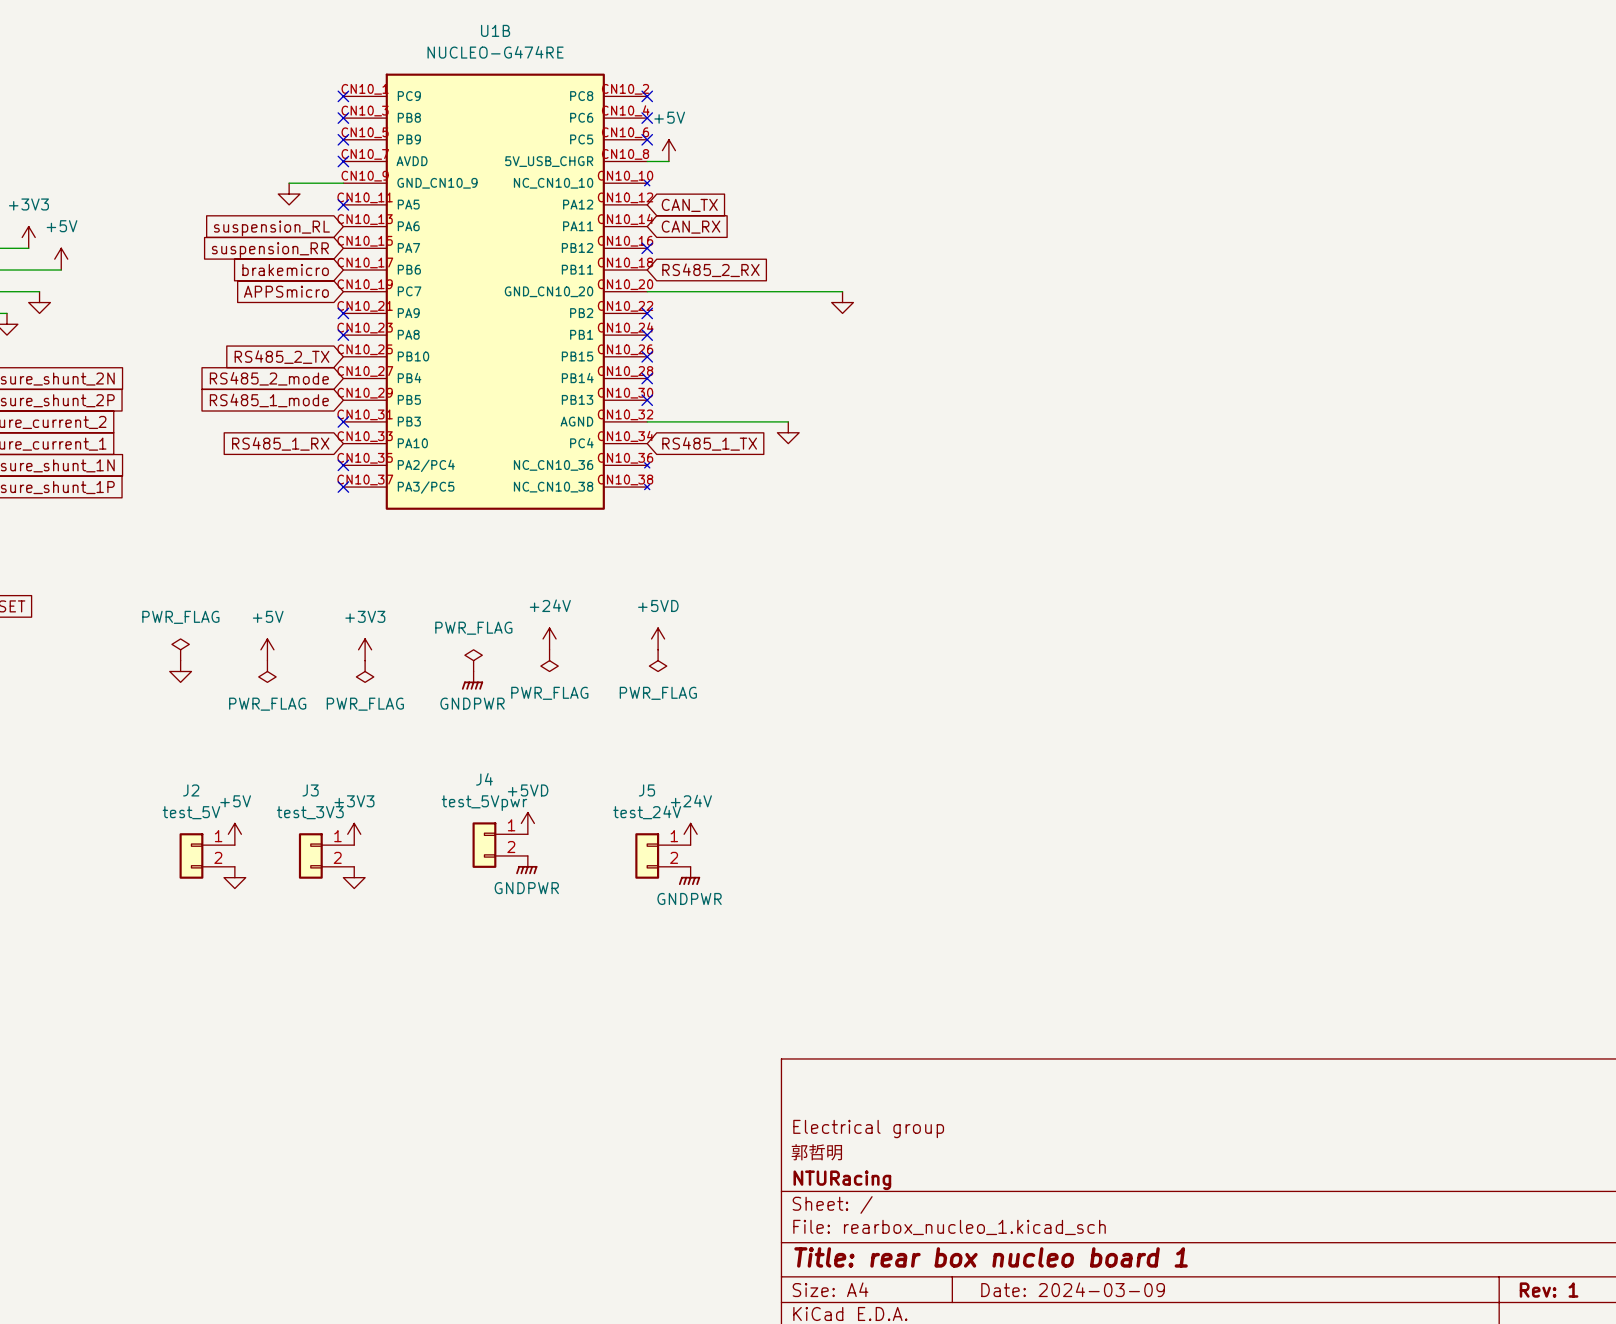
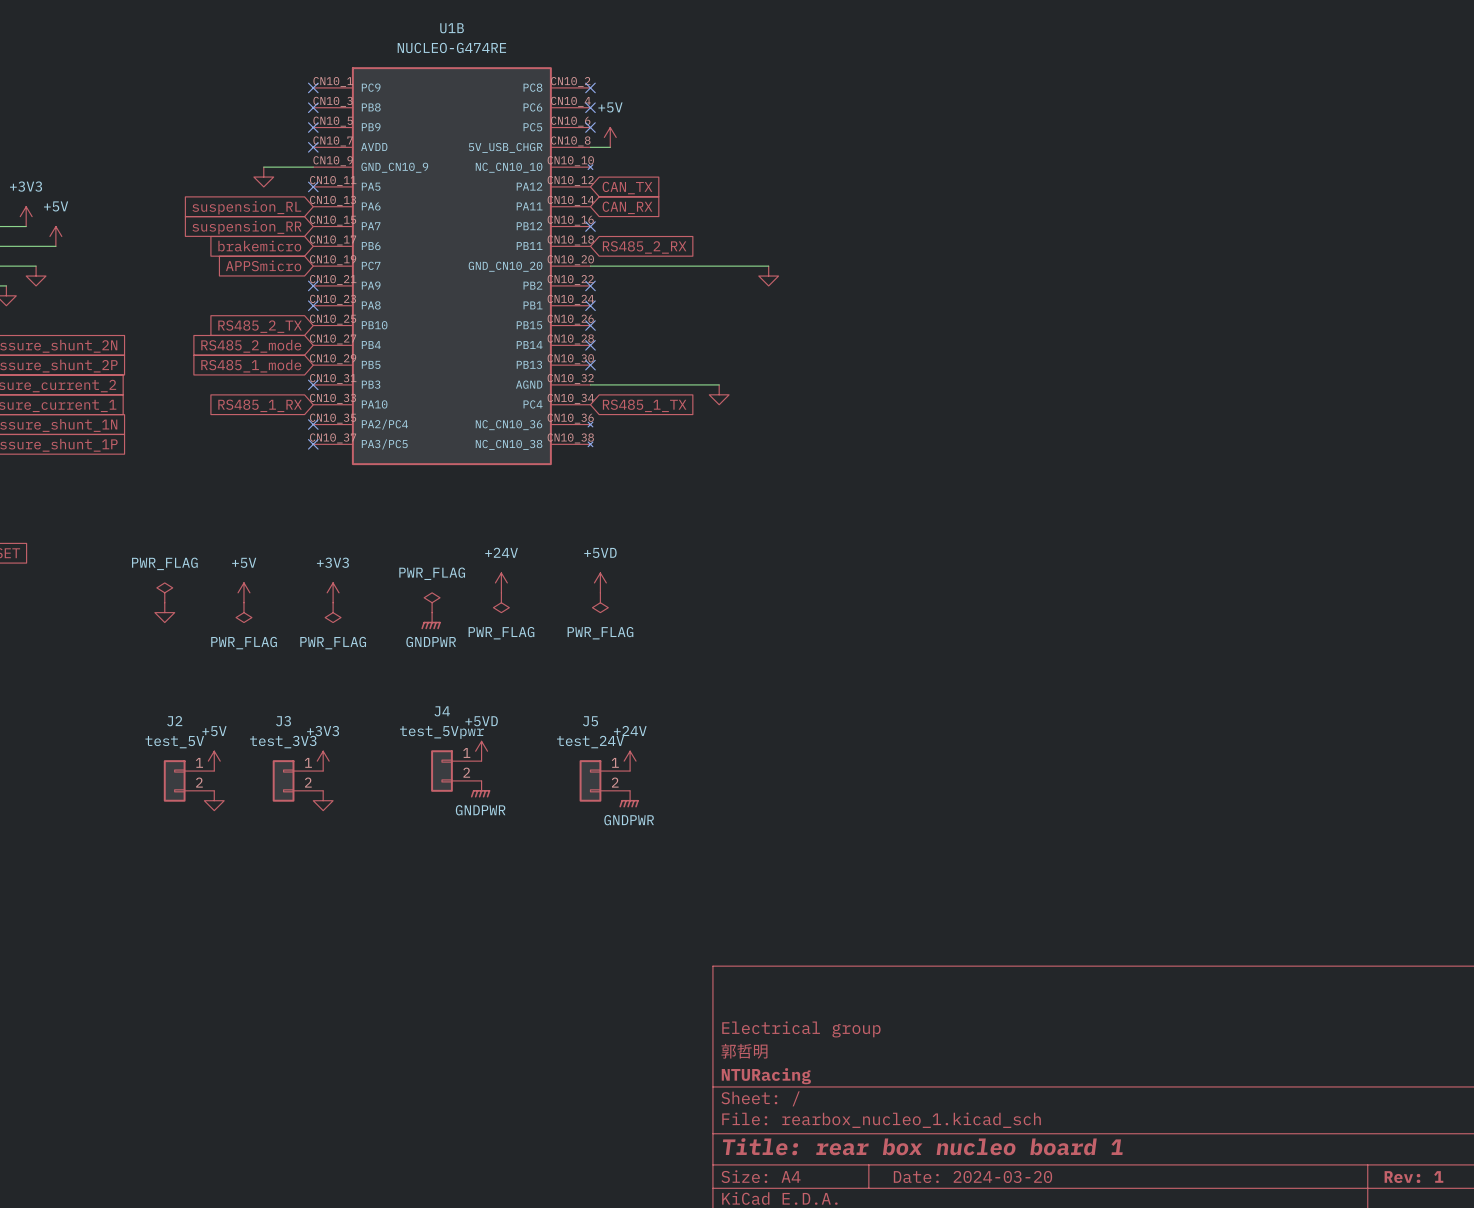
title block: Date: 2024-03-09 (1073, 1289) -> Date: 2024-03-20 (972, 1176)

